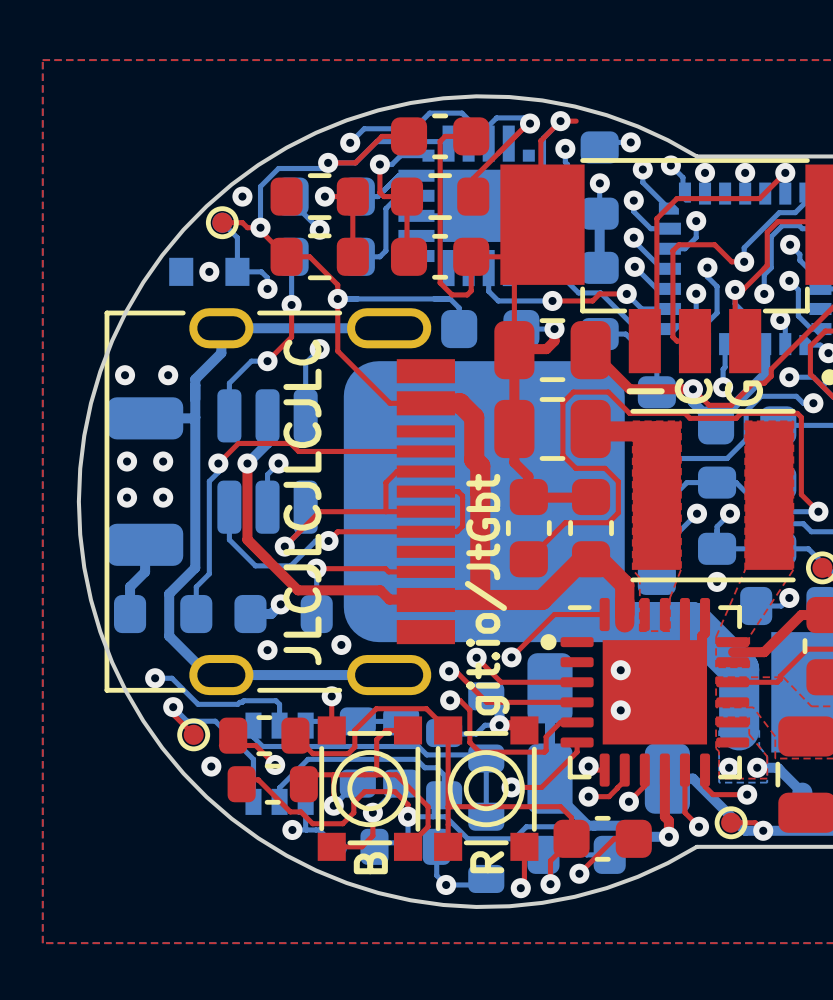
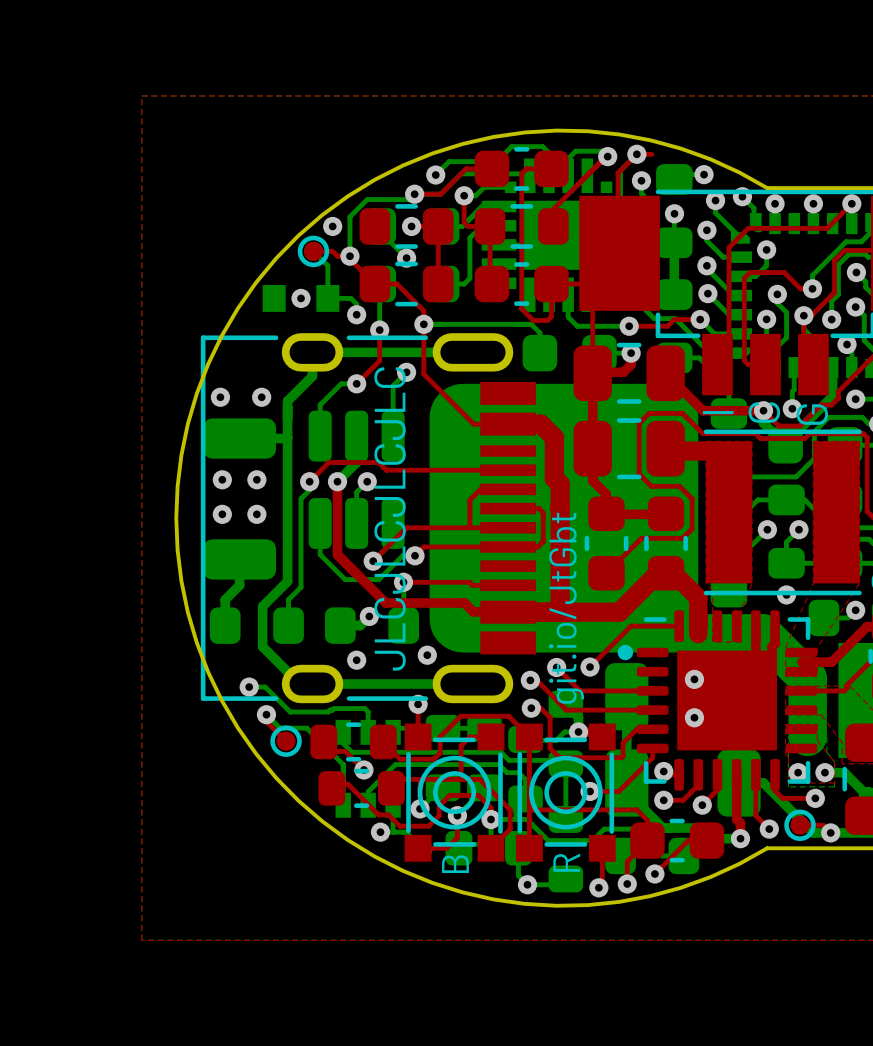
via: (211, 766) -> none

